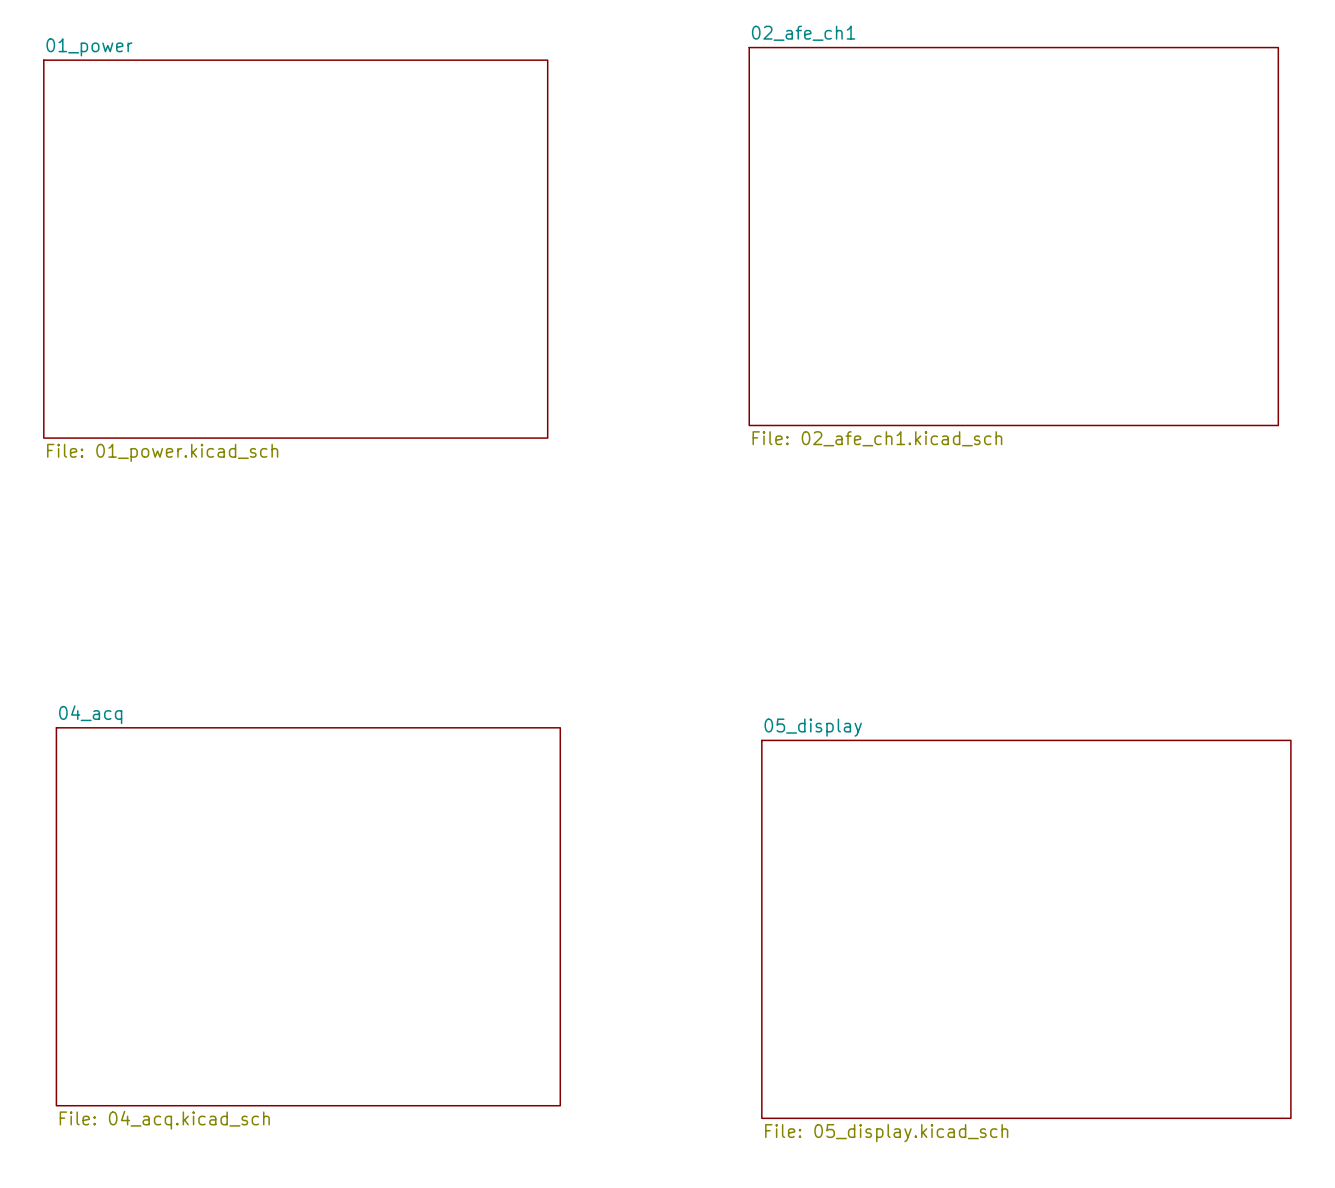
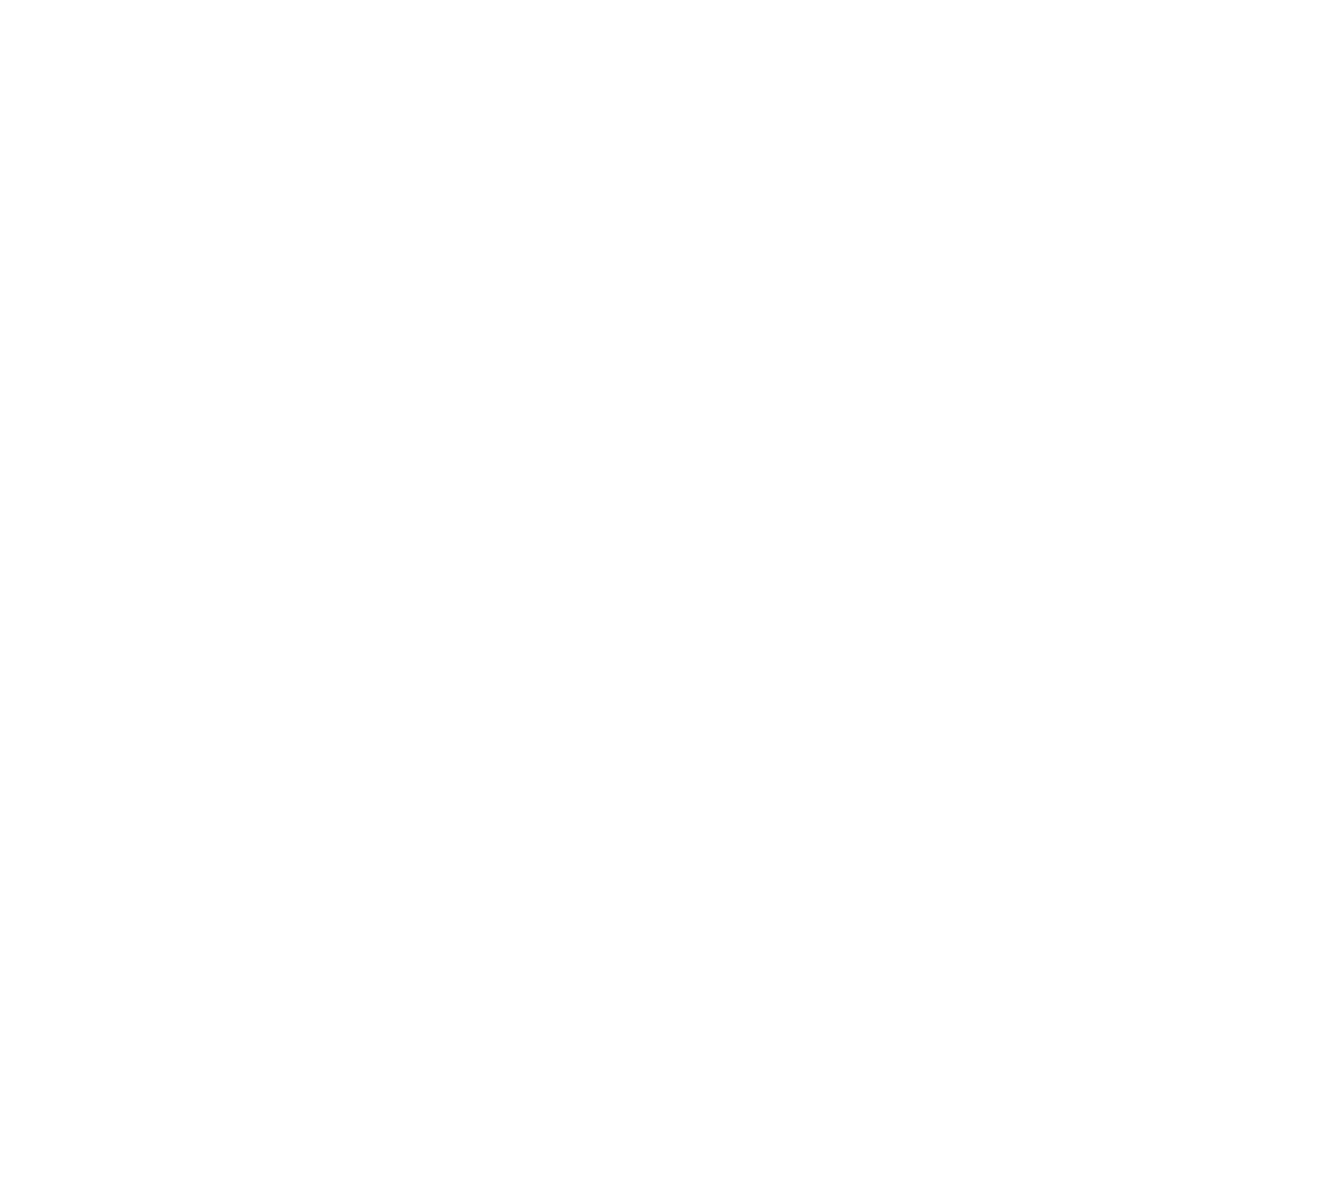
sheet 02_afe_ch1: File: 02_afe_ch1.kicad_sch (1013, 236) -> none
sheet 01_power: File: 01_power.kicad_sch (295, 249) -> none
sheet 04_acq: File: 04_acq.kicad_sch (308, 916) -> none
sheet 05_display: File: 05_display.kicad_sch (1026, 929) -> none

